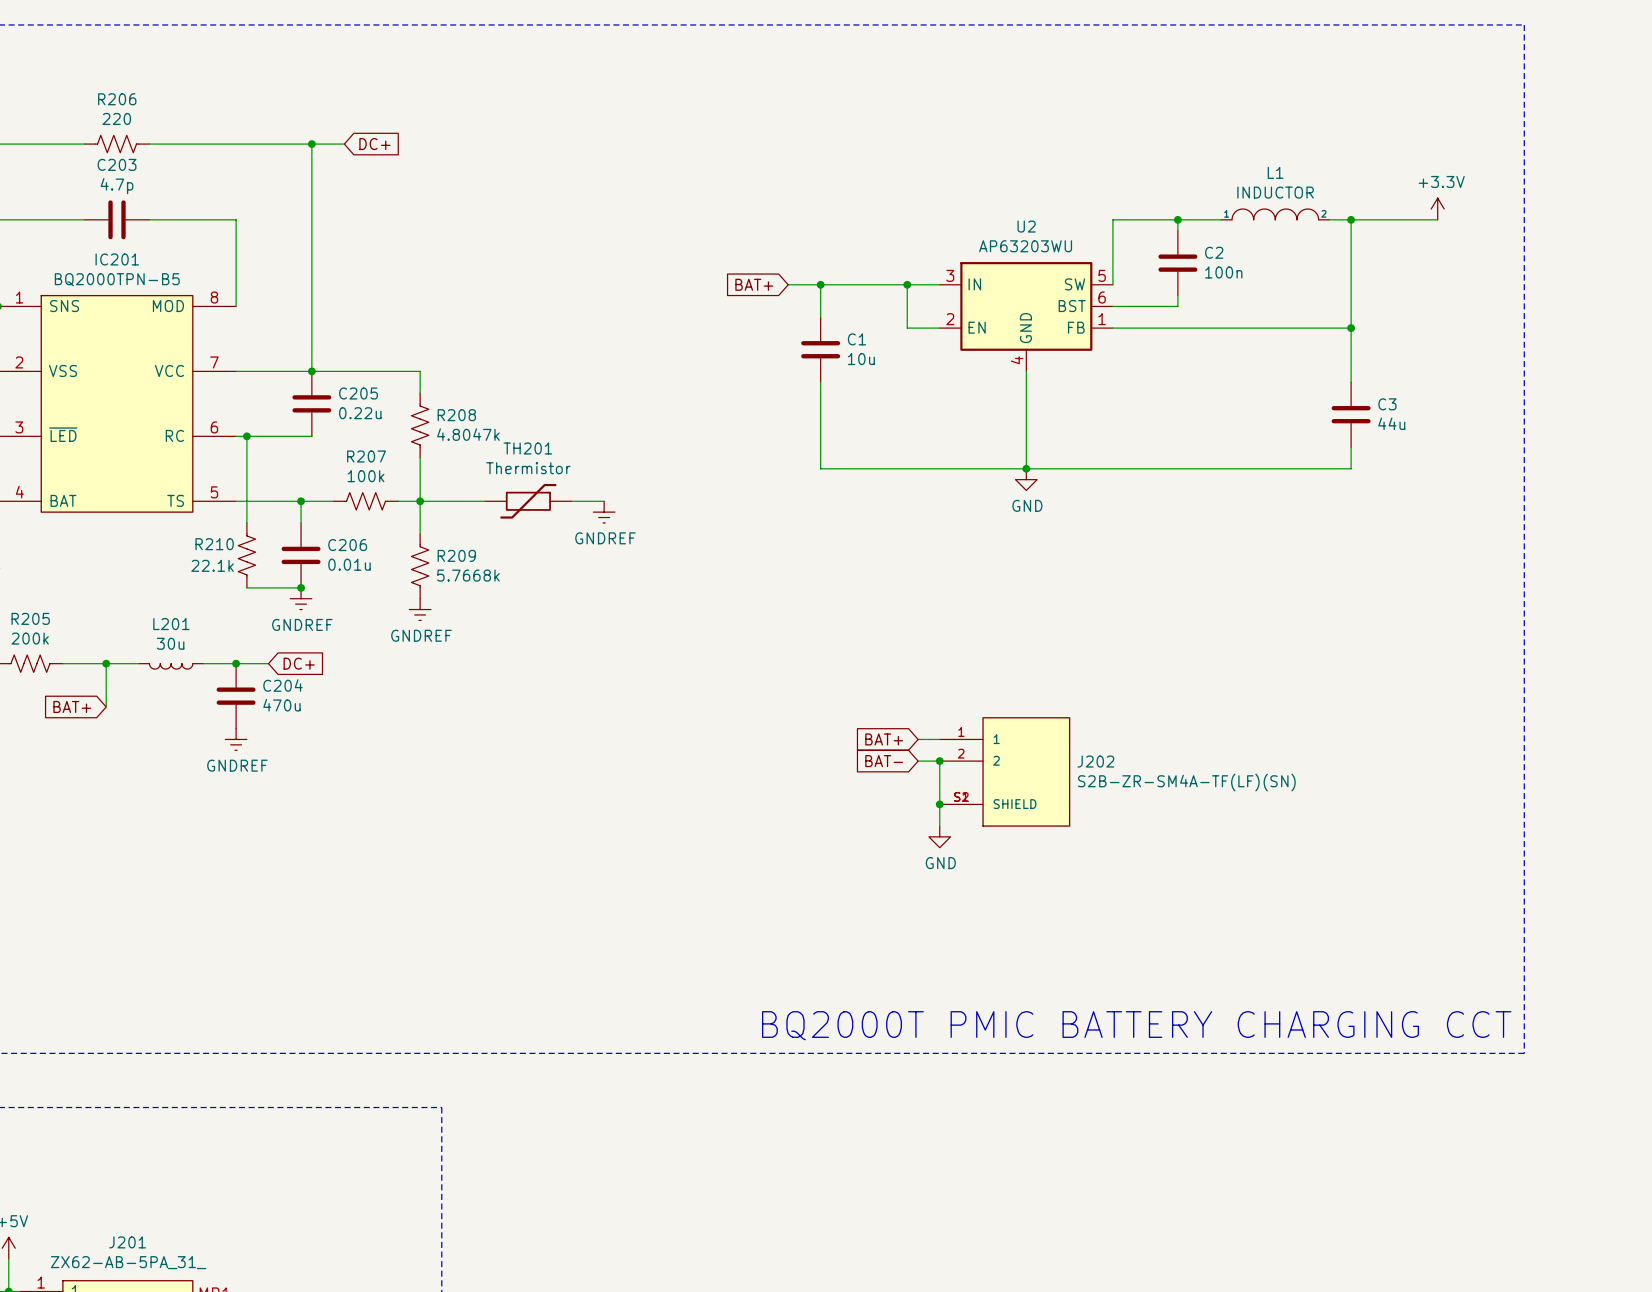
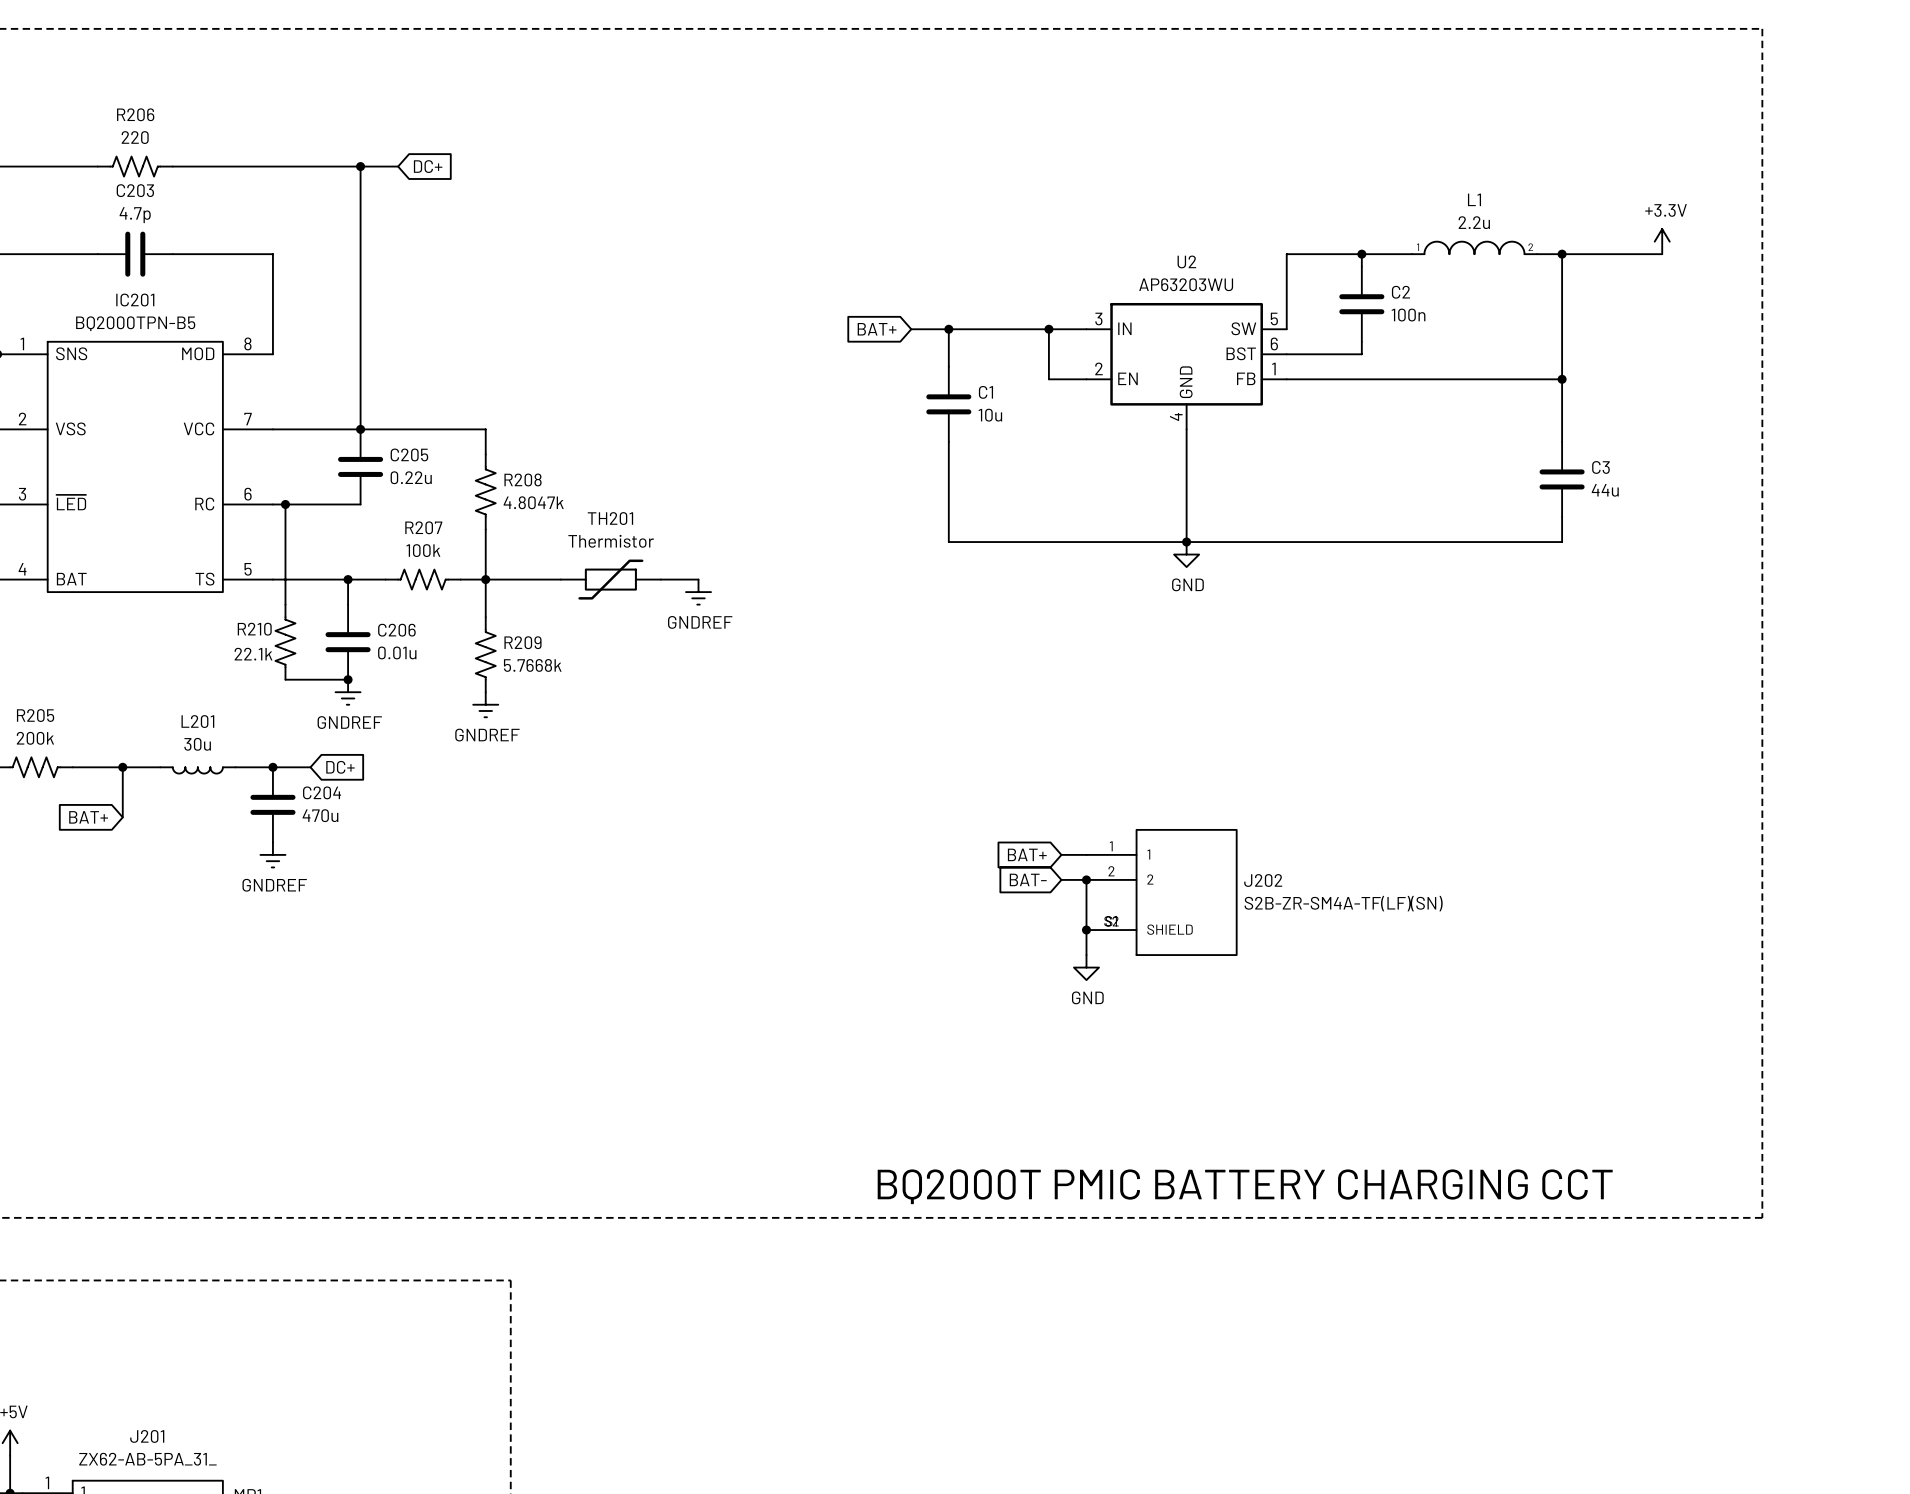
L1 value: INDUCTOR (1275, 192) -> 2.2u (1474, 222)

